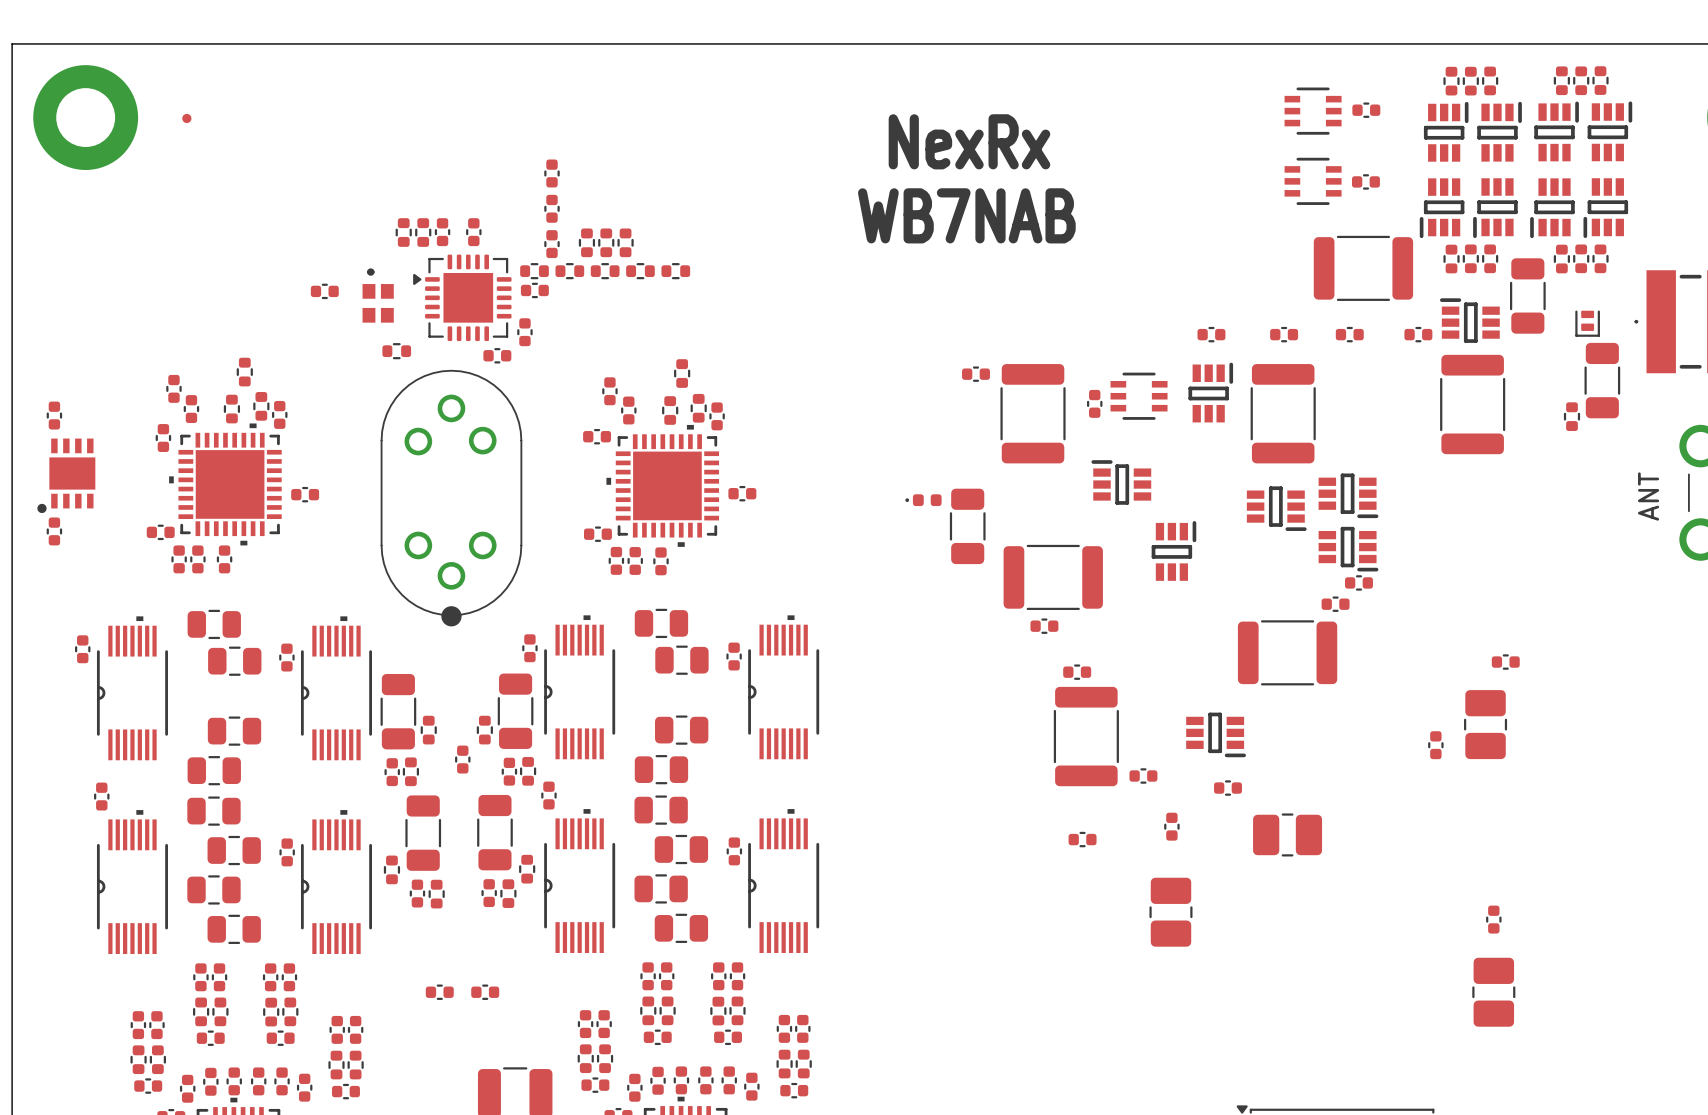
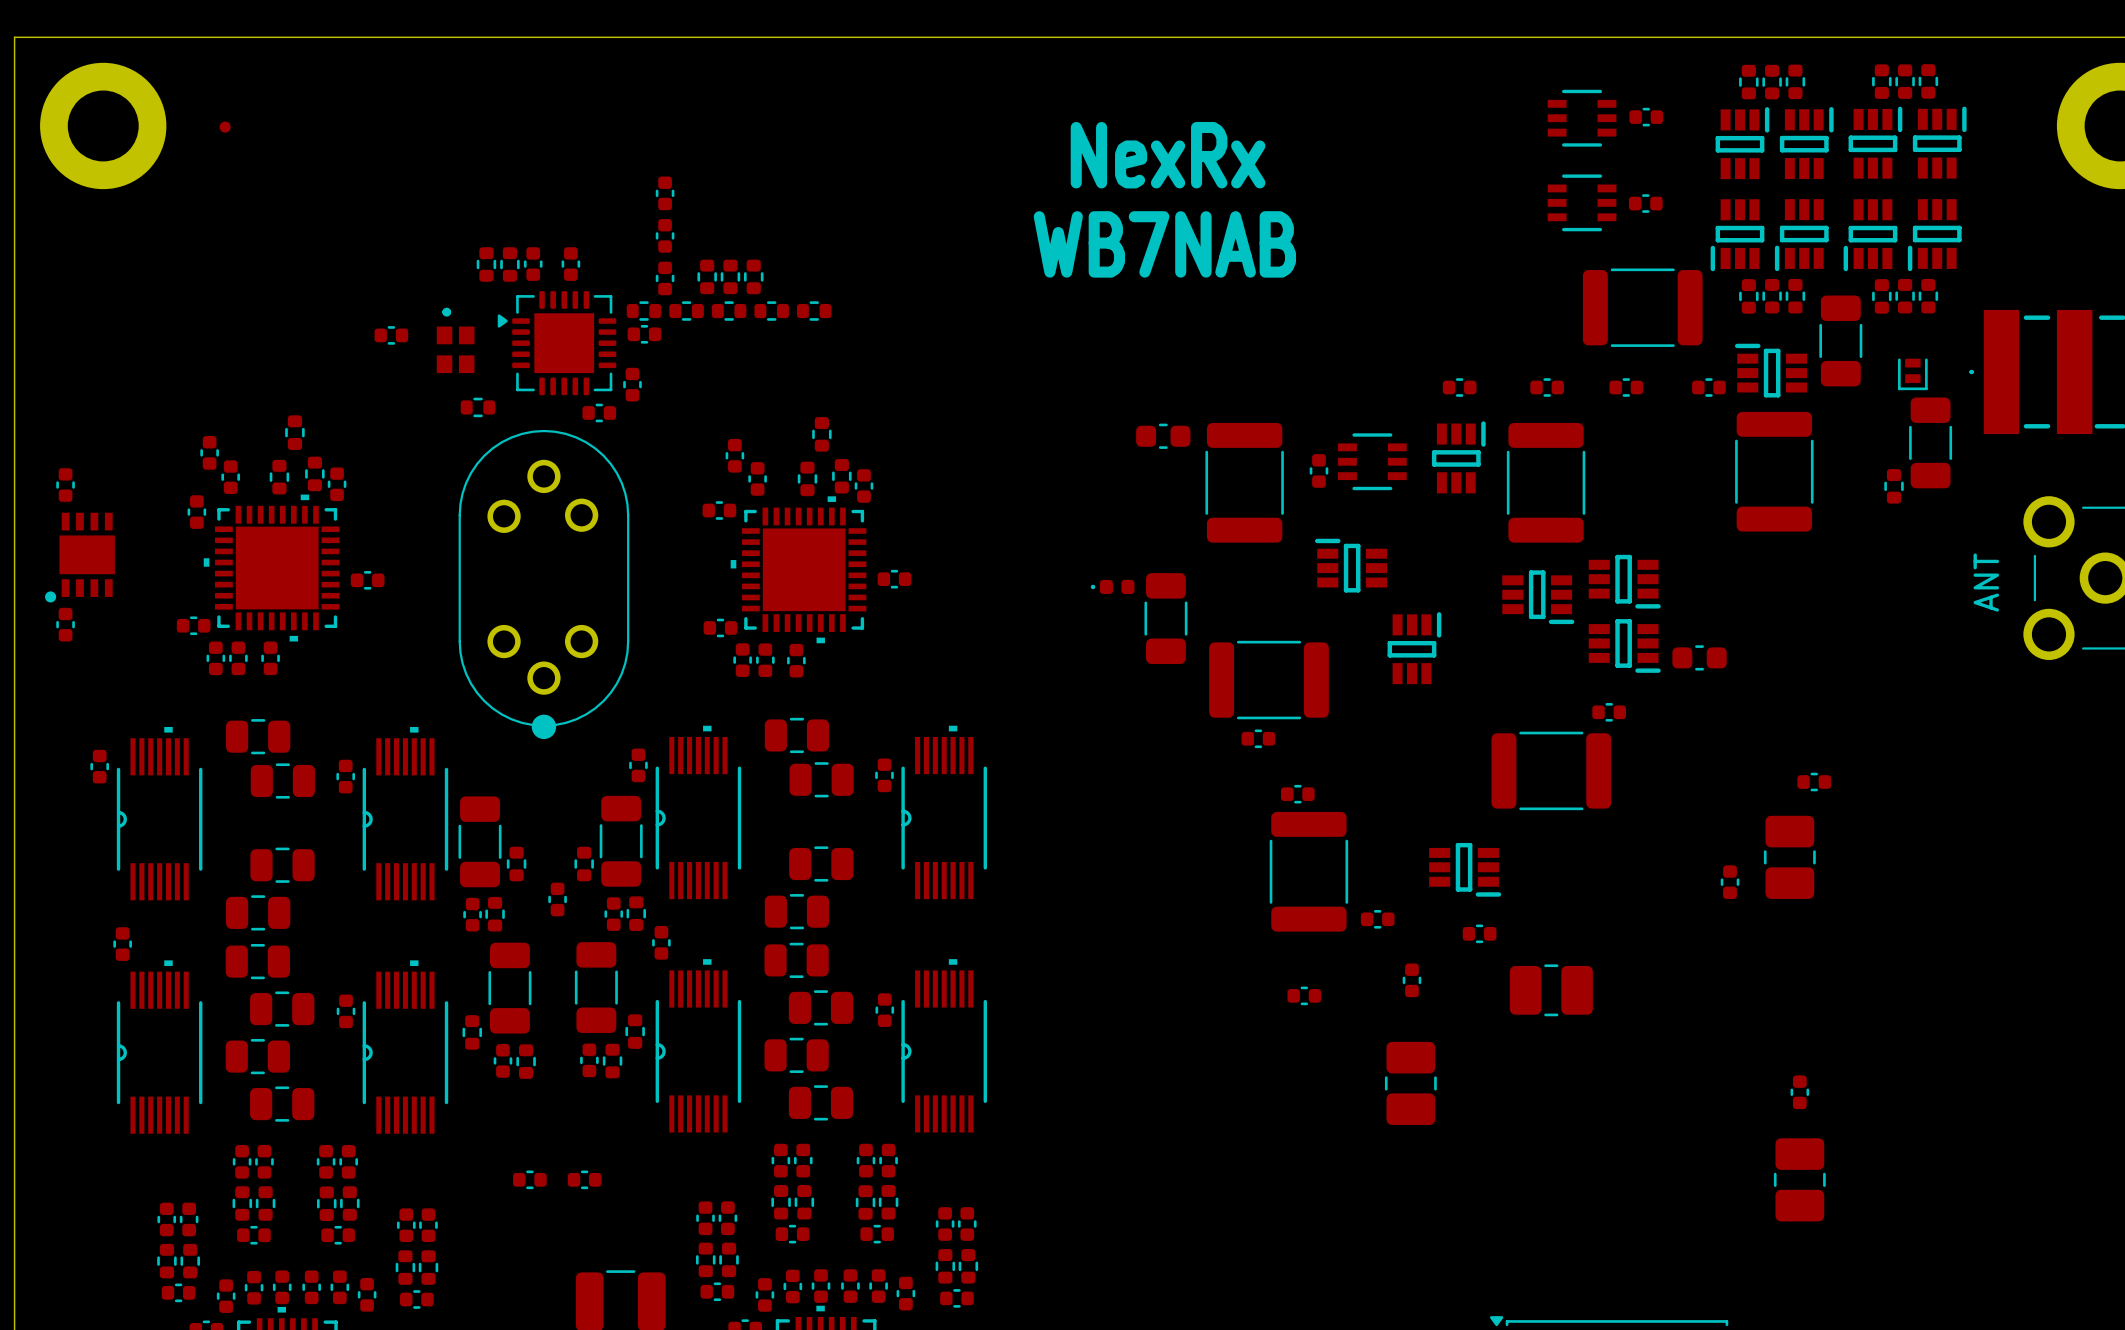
part footprint: [962, 366, 990, 382] -> [1136, 423, 1191, 449]
part: none -> (1699, 657)
part: (1358, 582) -> none

